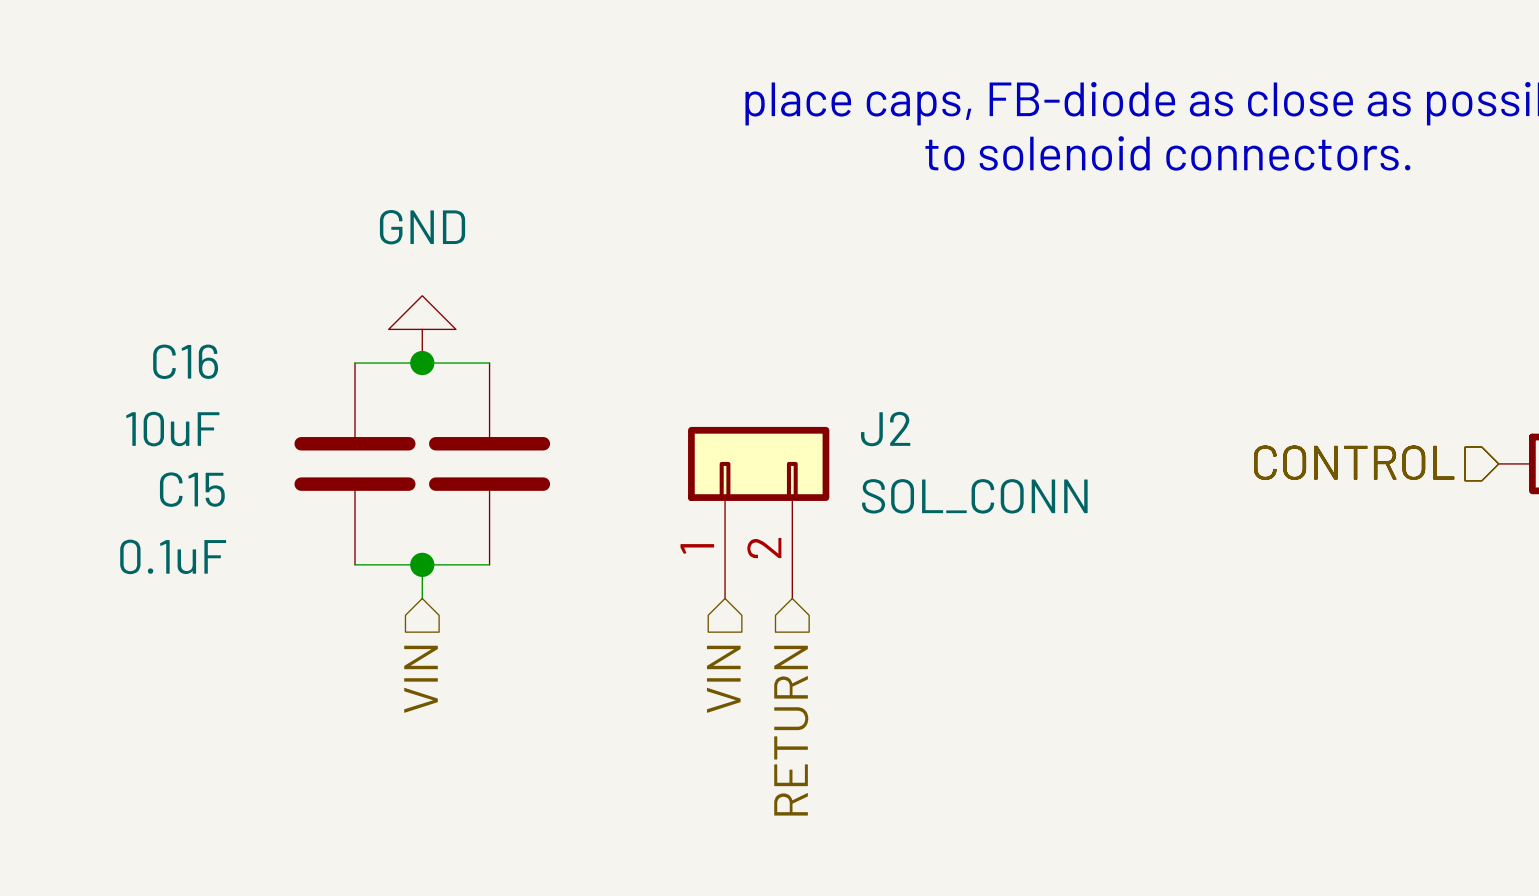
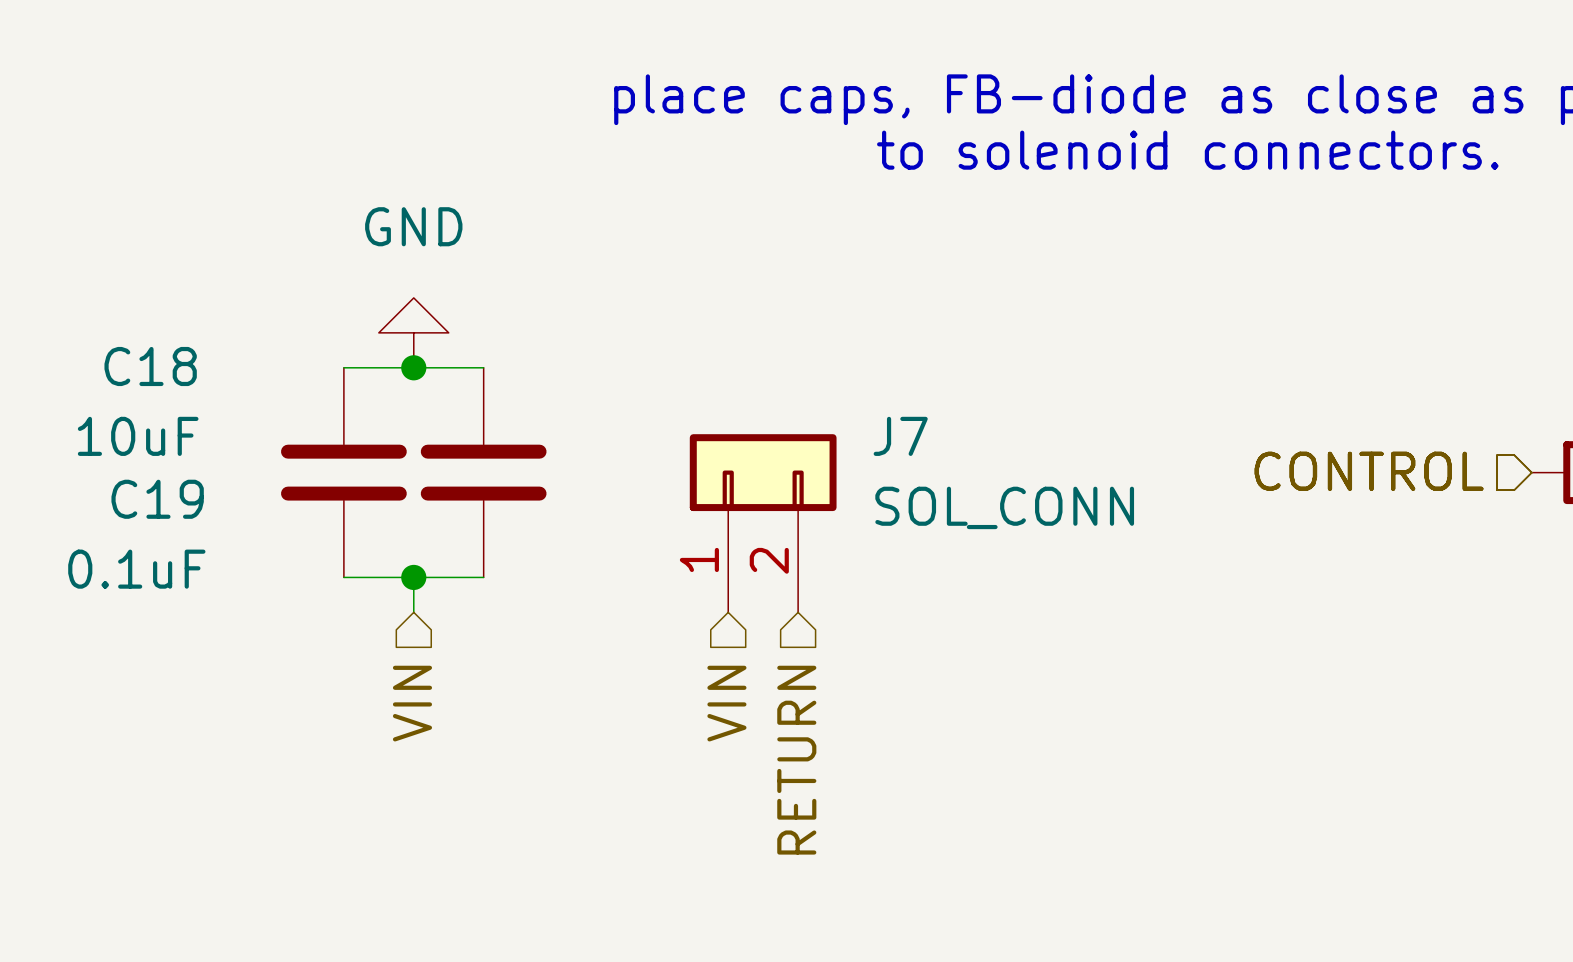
C16 name: C16 (185, 361) -> C18 (150, 366)
J2 name: J2 (885, 429) -> J7 (900, 436)
C15 name: C15 (192, 489) -> C19 (157, 499)

